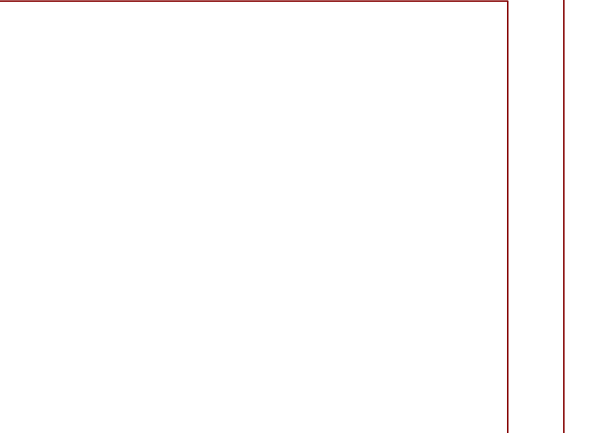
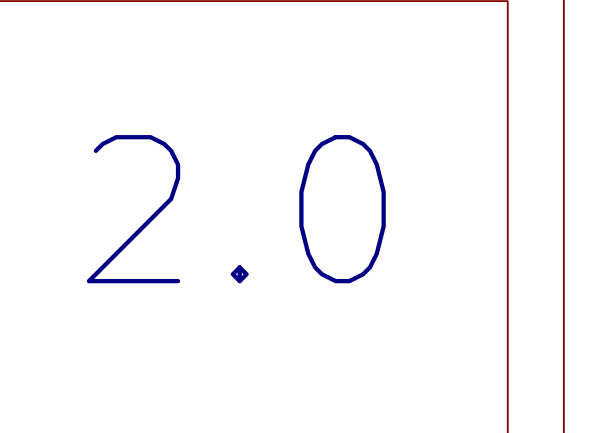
text: none -> 2.0 (236, 209)

